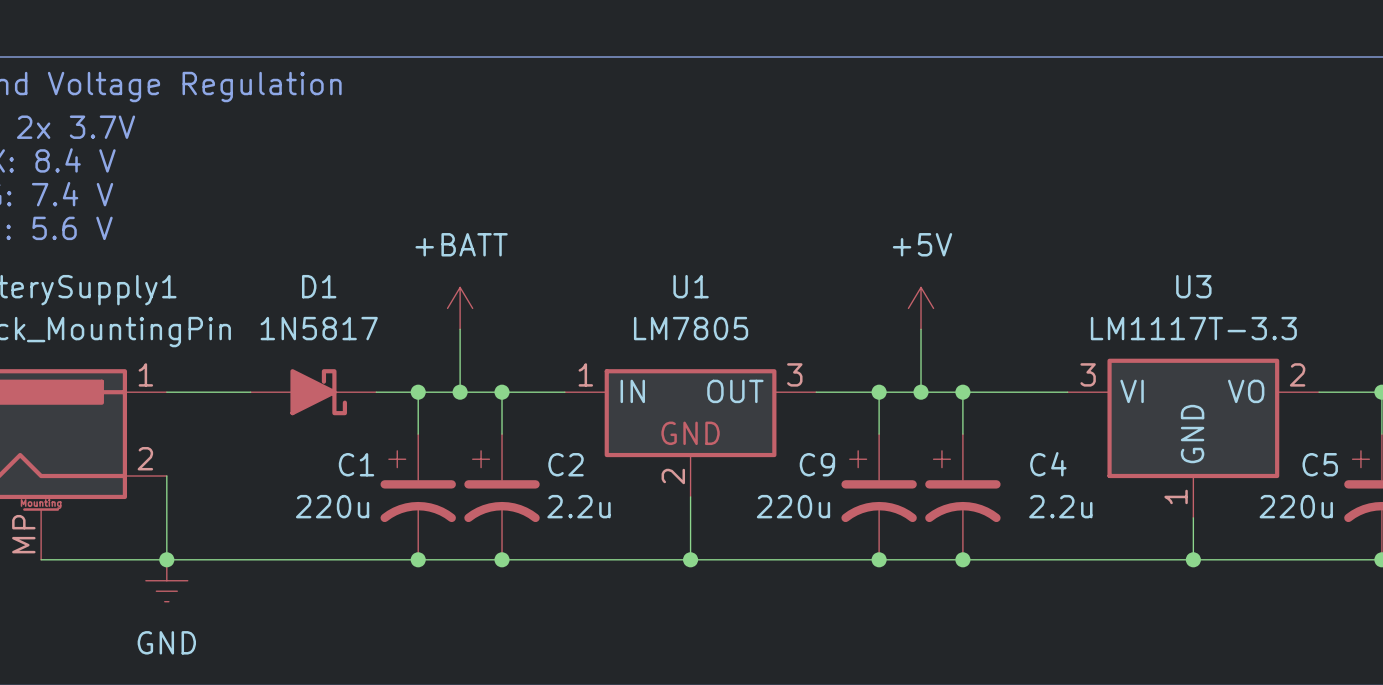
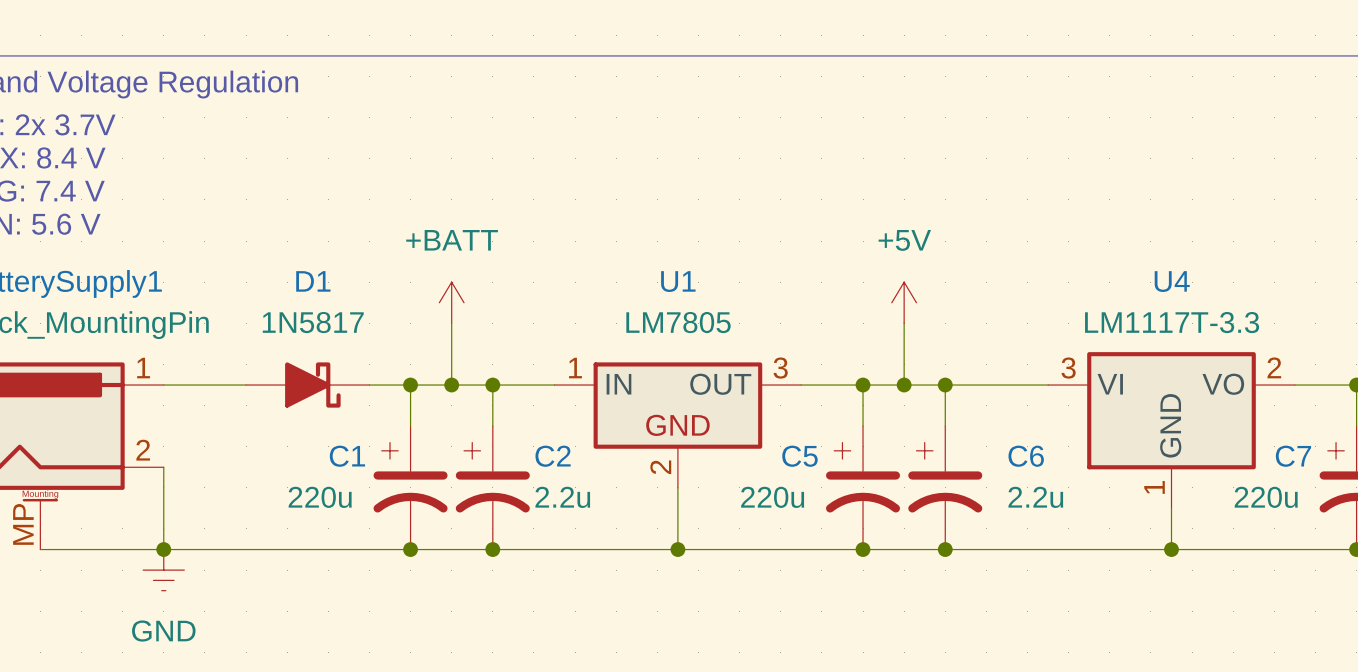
U3 name: U3 (1193, 286) -> U4 (1172, 281)
C9 name: C9 (817, 464) -> C5 (799, 456)
C4 name: C4 (1048, 464) -> C6 (1026, 456)
C5 name: C5 (1320, 464) -> C7 (1293, 456)

